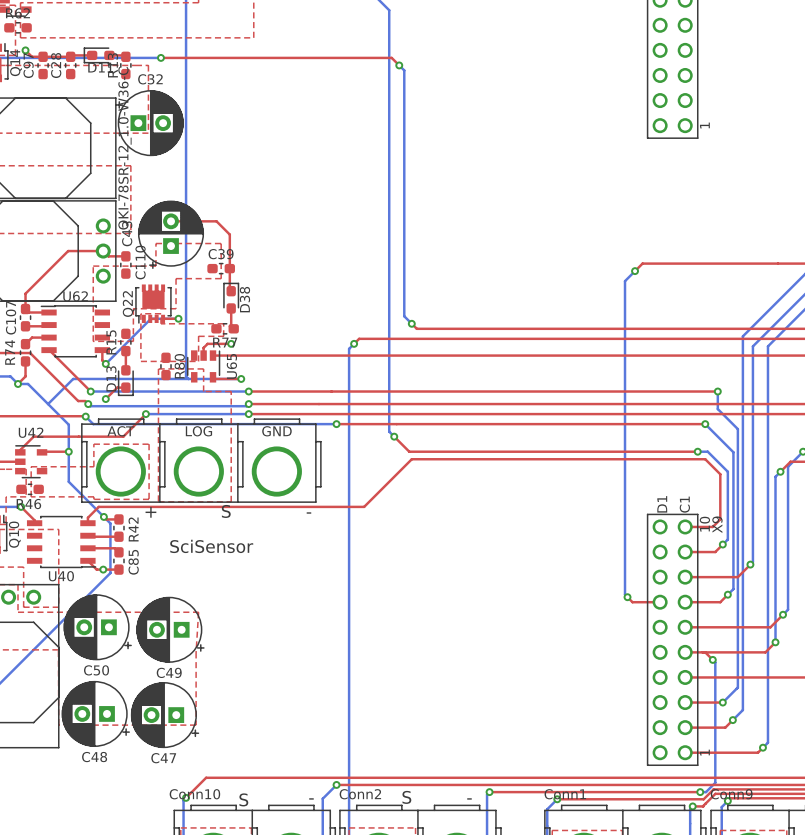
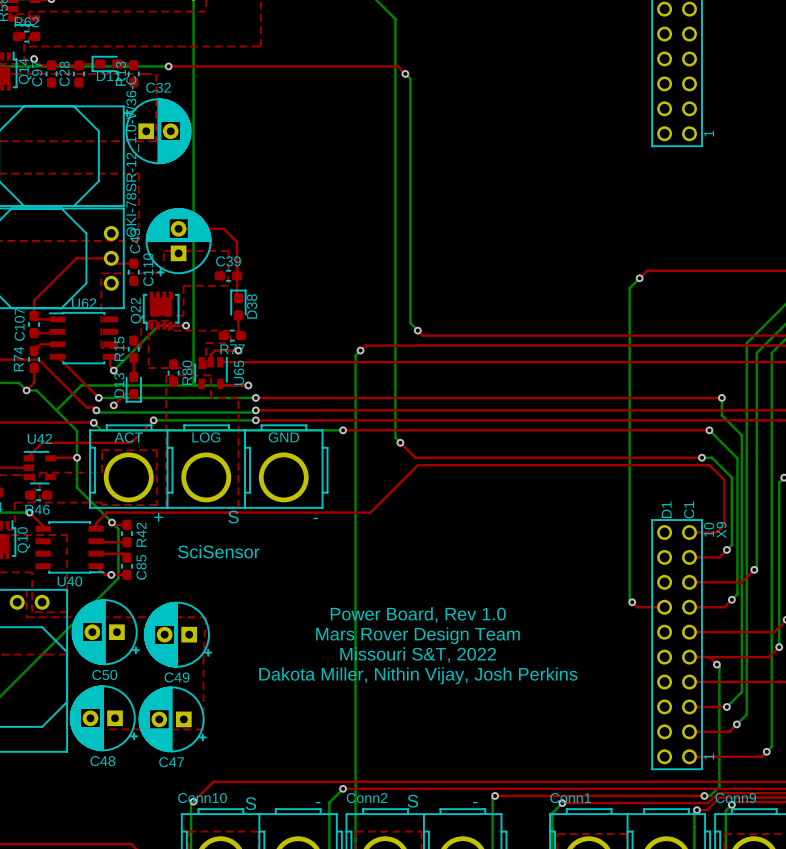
text: none -> Power Board, Rev 1.0 (418, 614)
text: none -> Mars Rover Design Team (418, 635)
text: none -> Missouri S&T, 2022 (418, 655)
text: none -> Dakota Miller, Nithin Vijay, Josh Perkins (418, 675)

